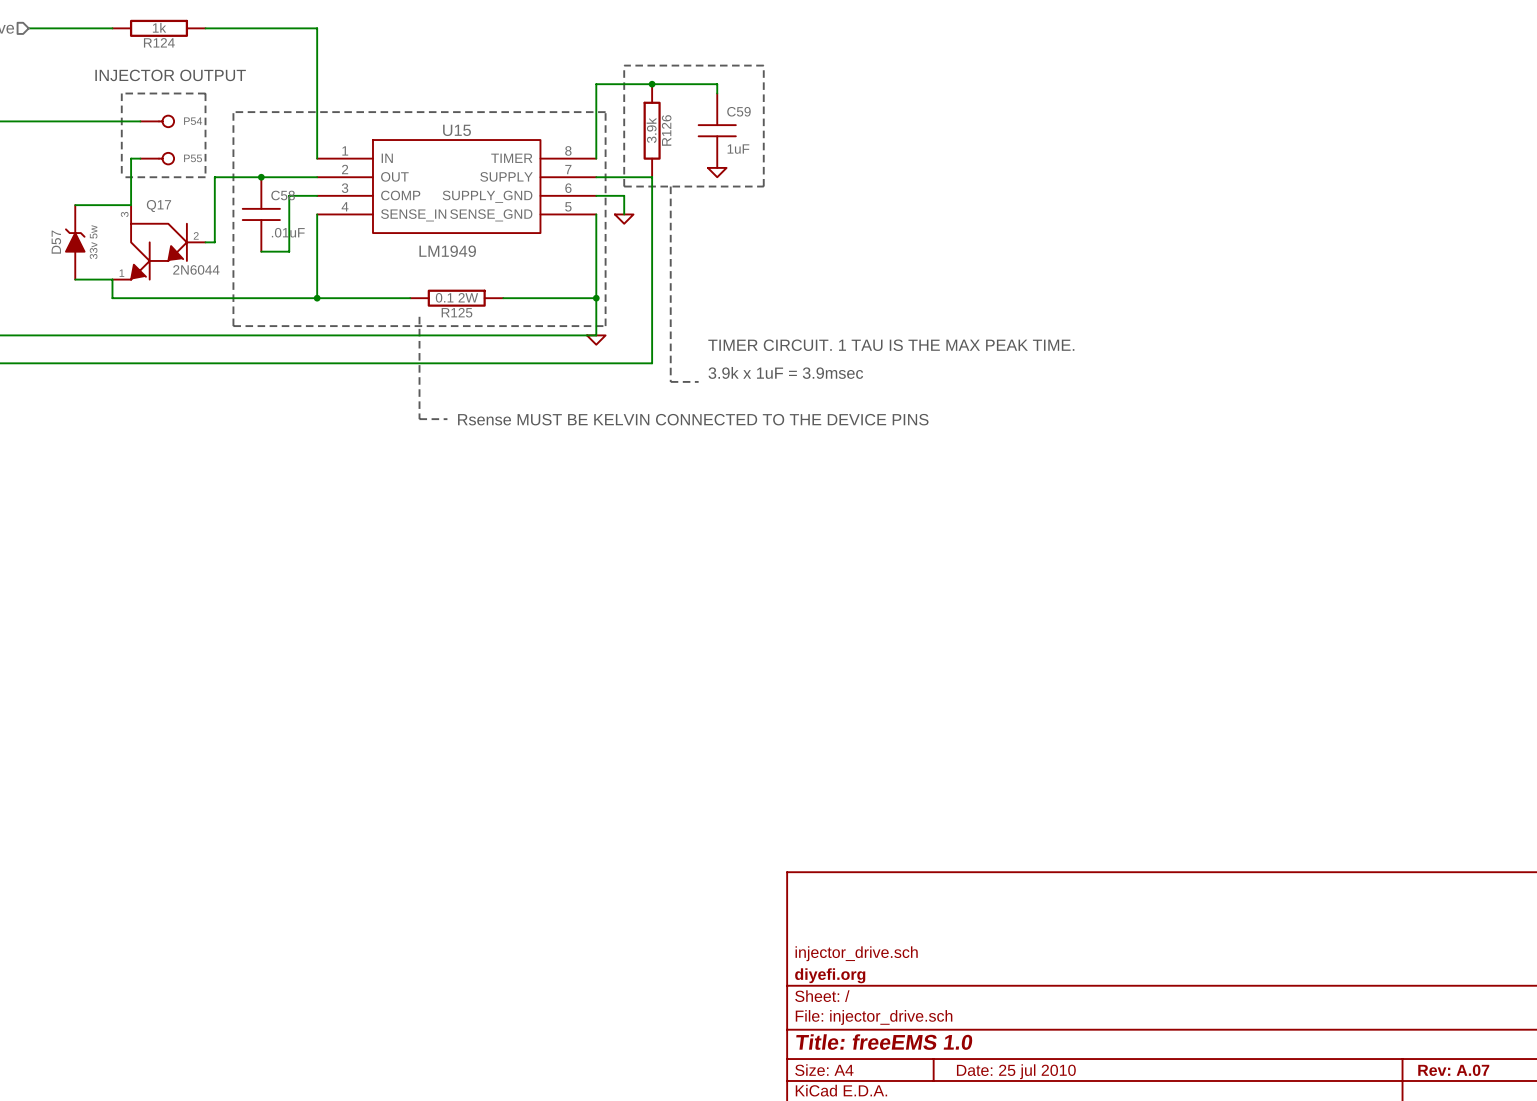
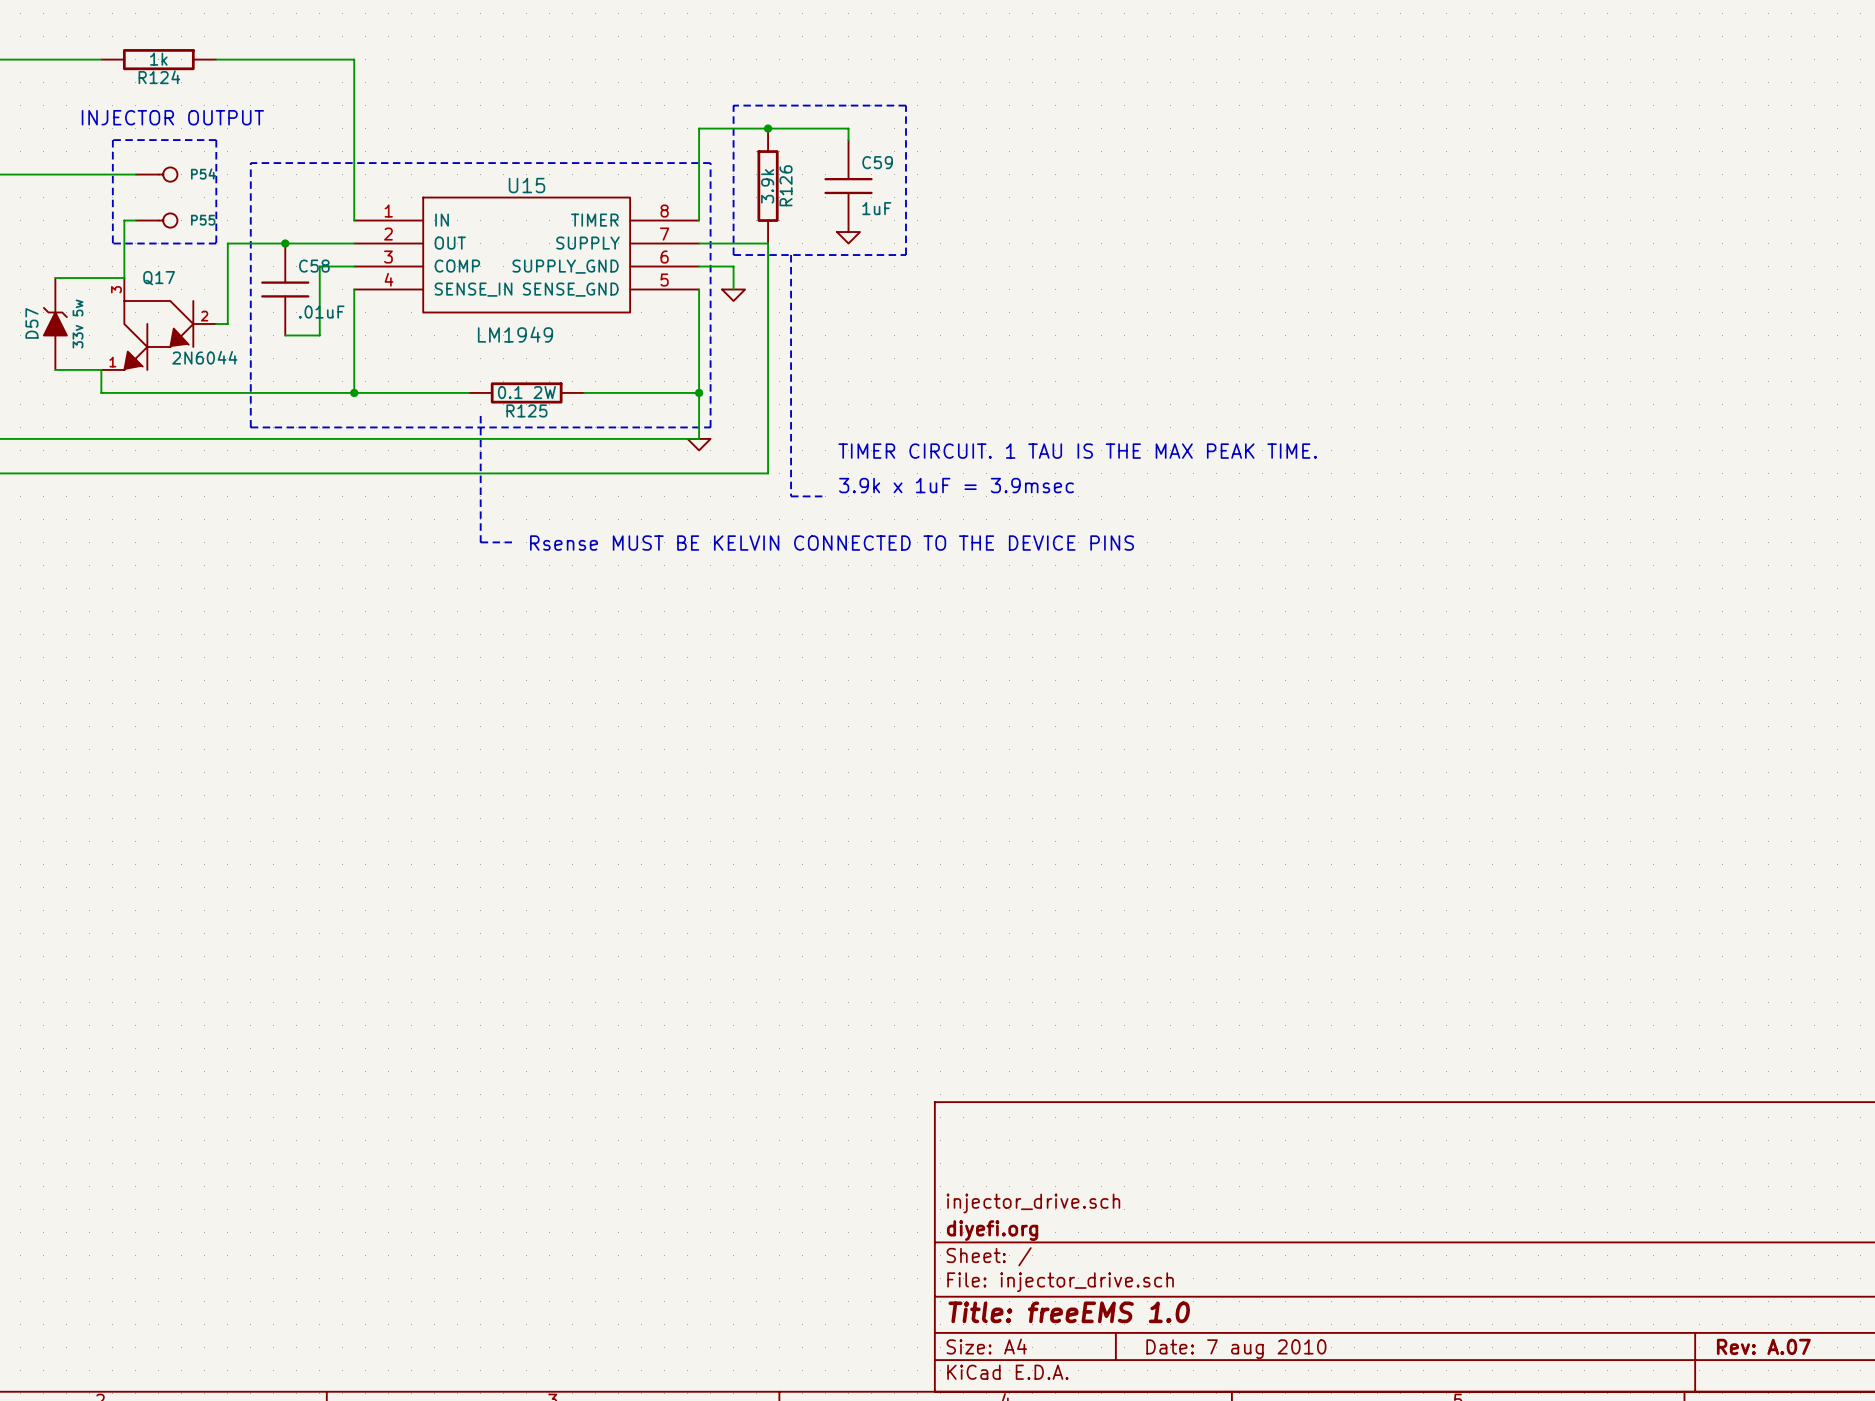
title block: Date: 25 jul 2010 (1016, 1071) -> Date: 7 aug 2010 (1236, 1349)

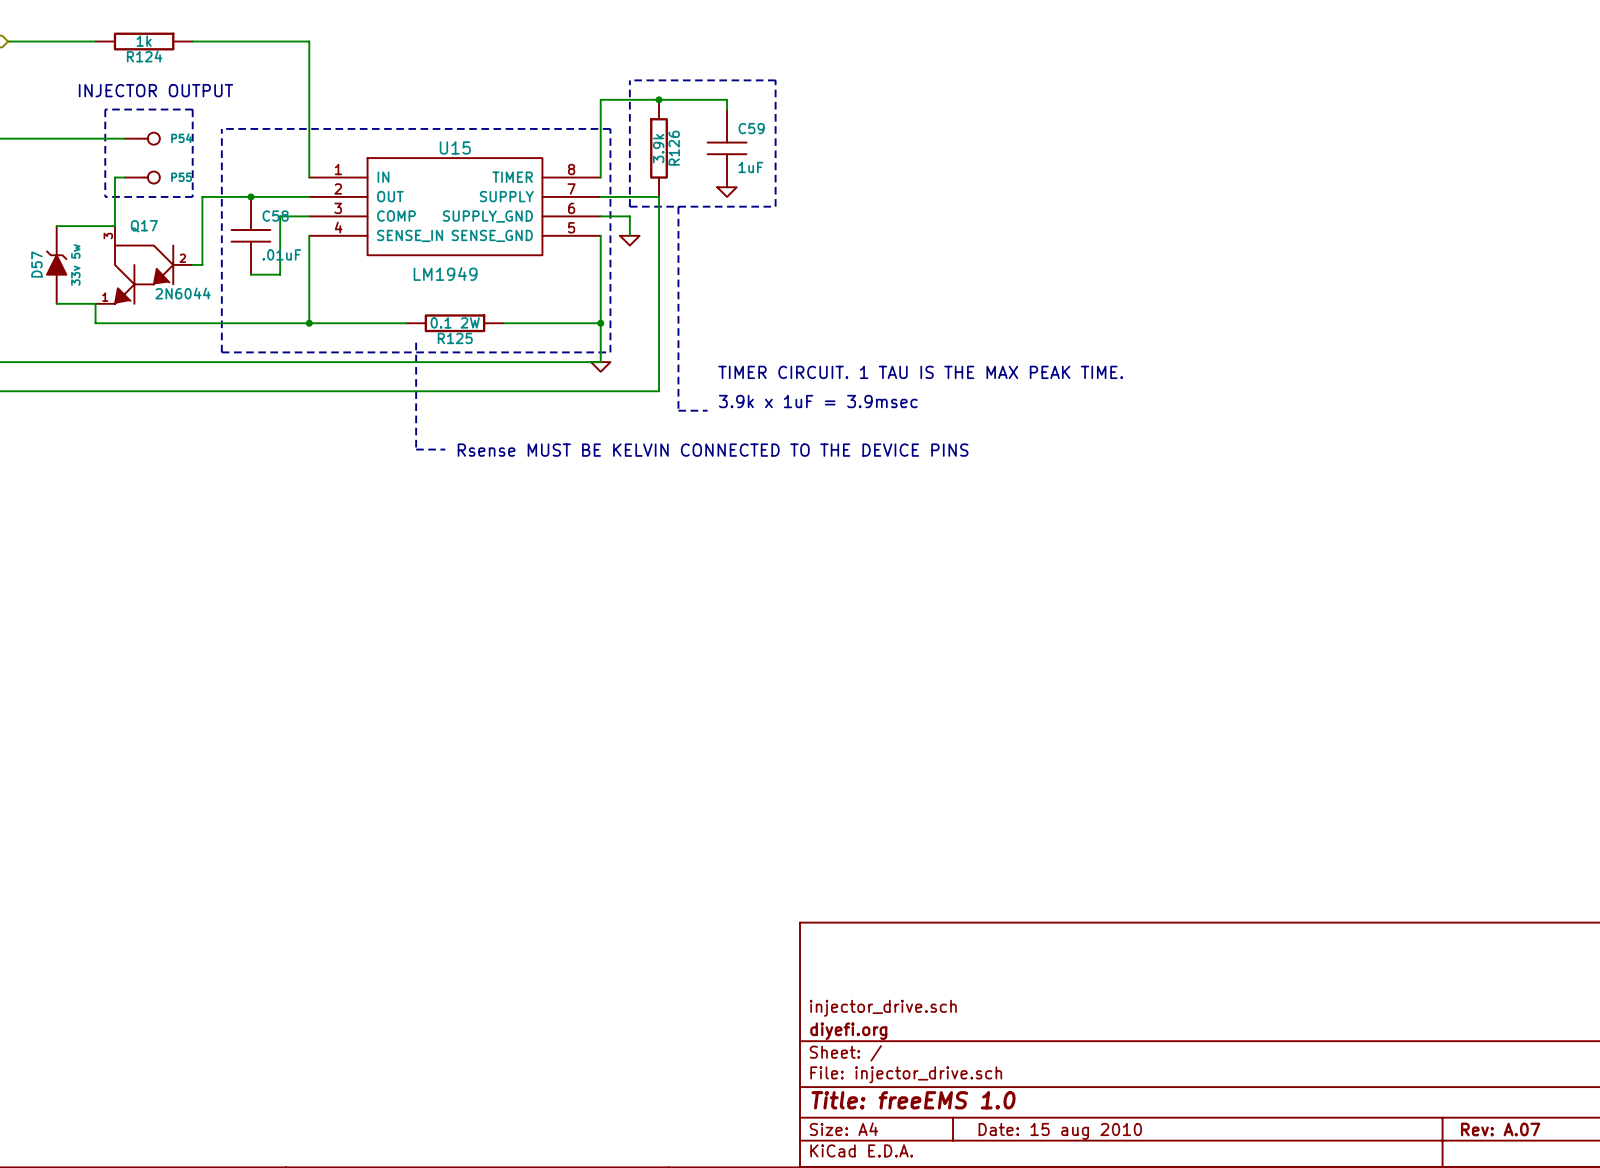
title block: Date: 7 aug 2010 (1236, 1349) -> Date: 15 aug 2010 (1060, 1131)

